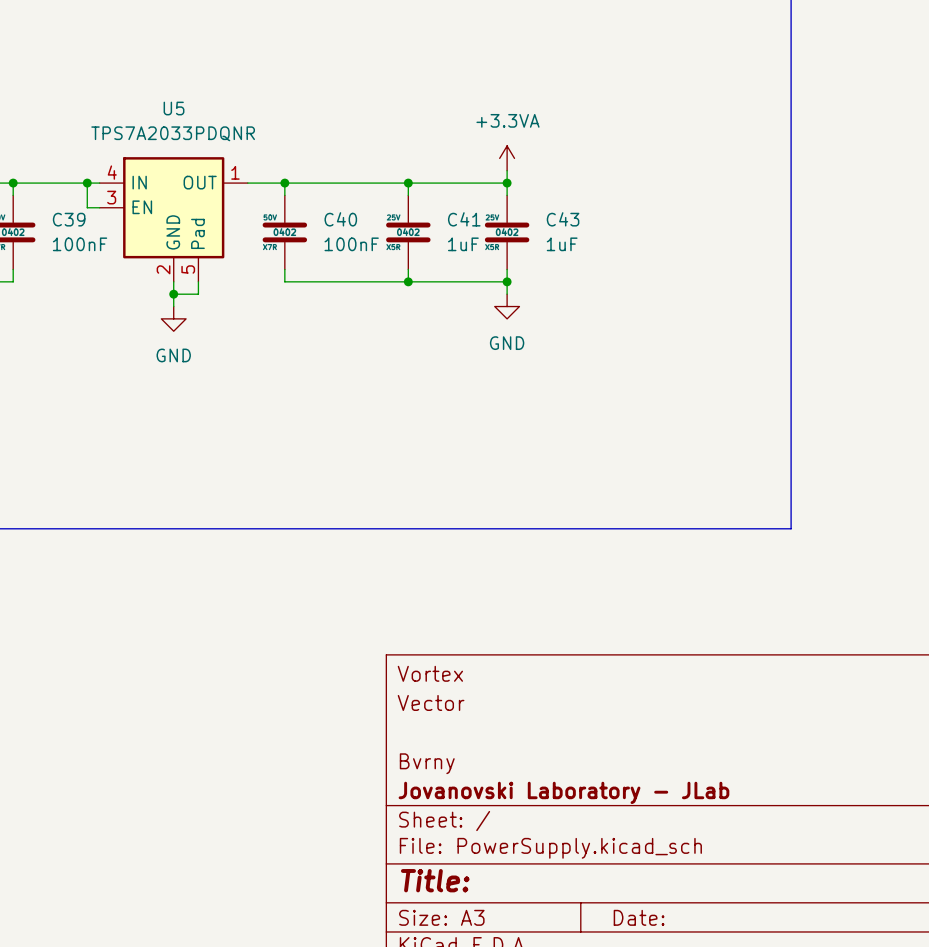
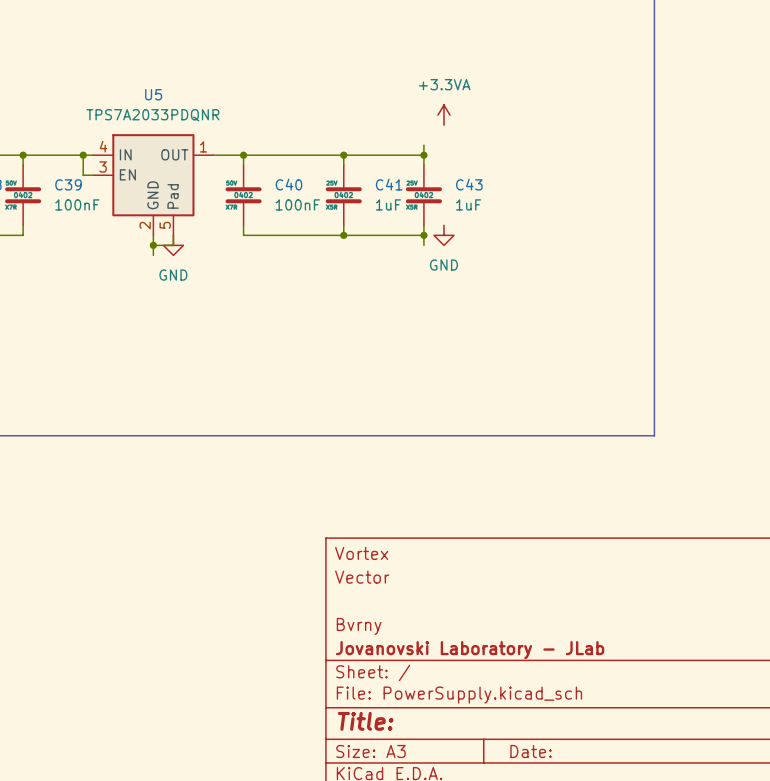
power symbol position: +3.3VA (507, 158) -> +3.3VA (443, 115)
power symbol position: GND (507, 306) -> GND (443, 235)
power symbol position: GND (173, 318) -> GND (173, 245)

